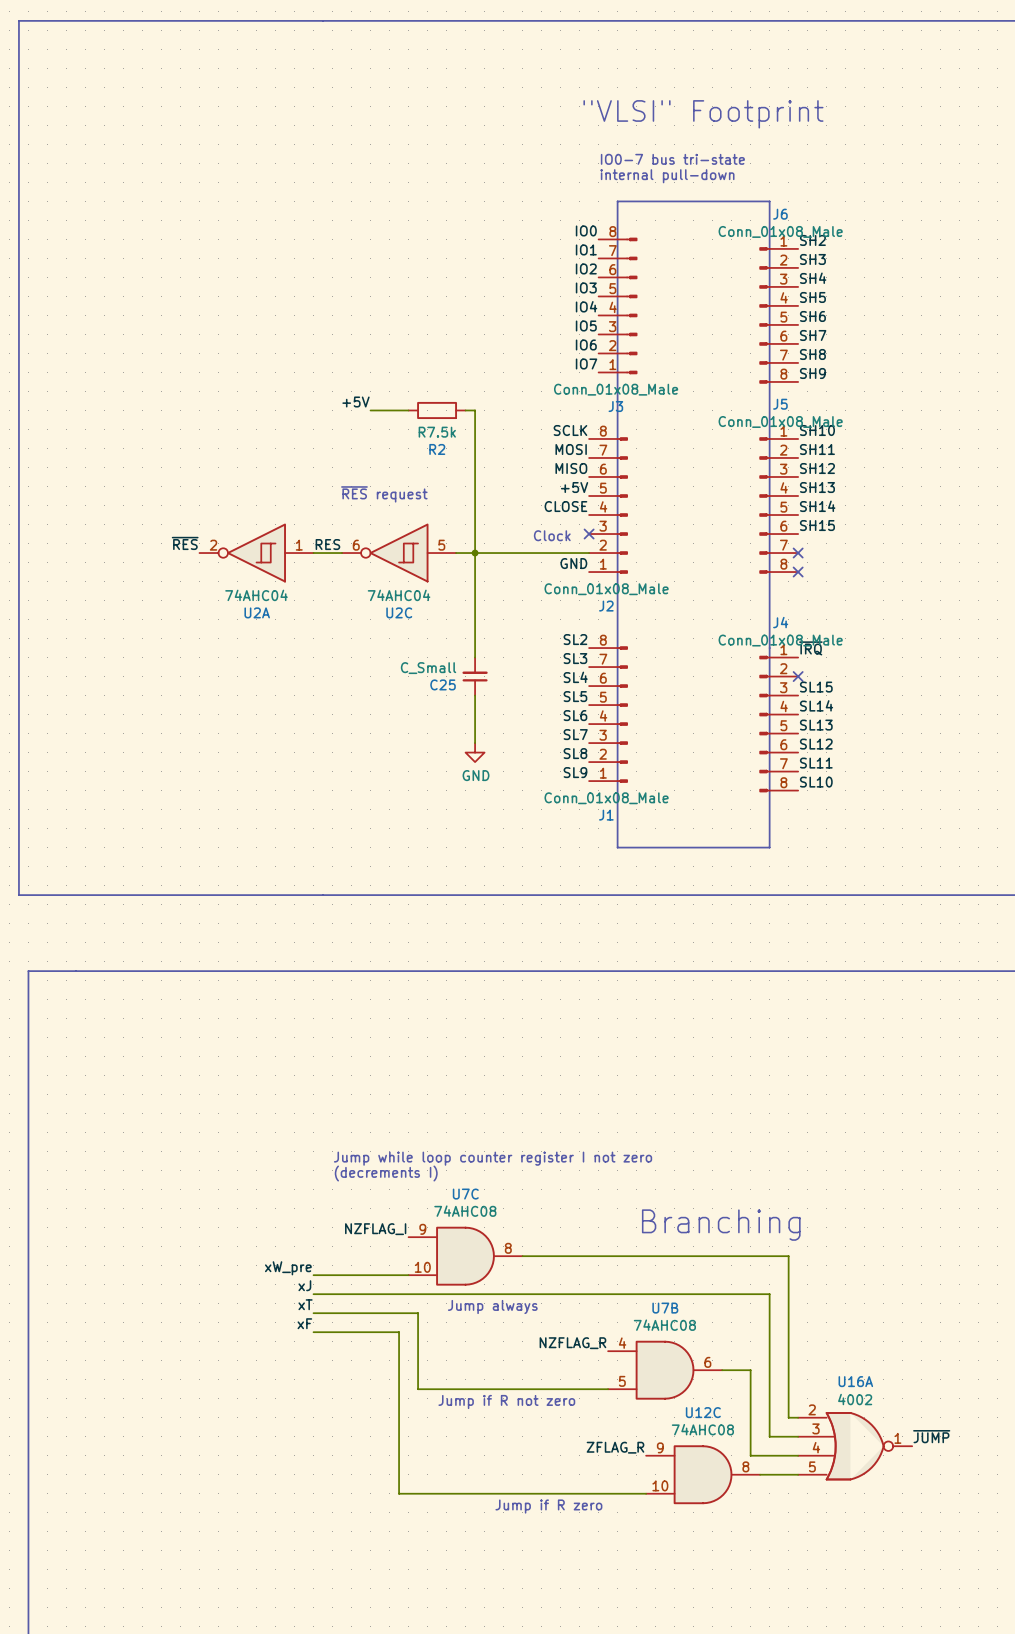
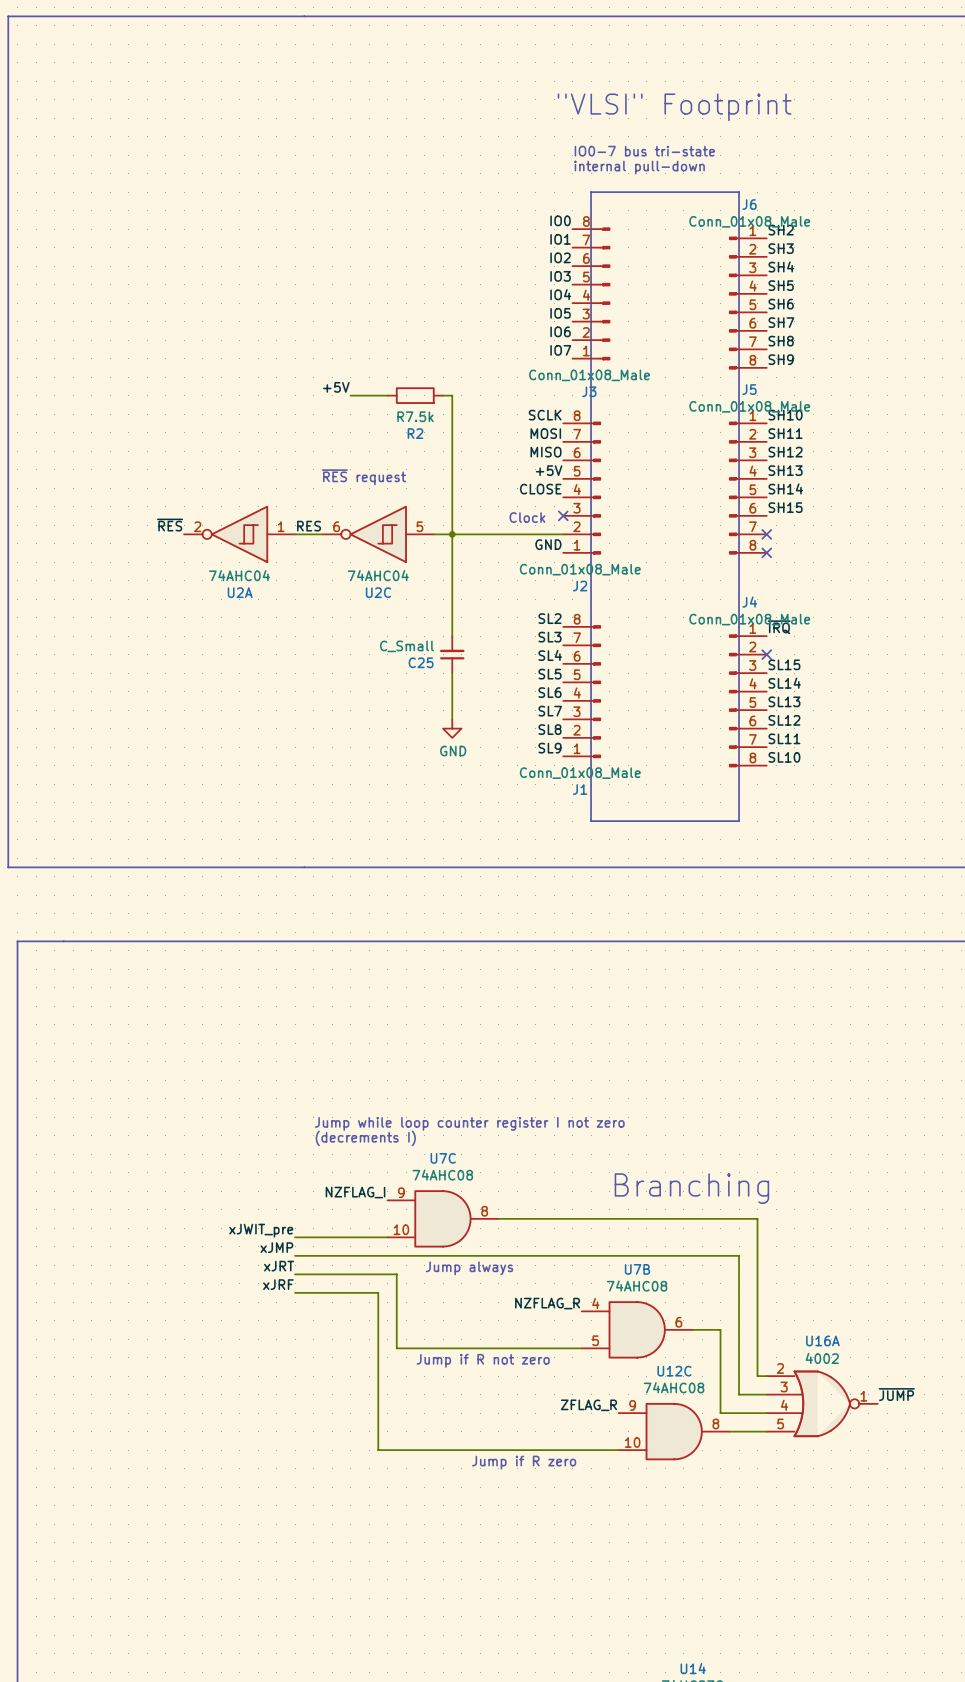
label: xW_pre (288, 1268) -> xJWIT_pre (261, 1230)
label: xJ (304, 1285) -> xJMP (276, 1247)
label: xT (305, 1304) -> xJRT (279, 1266)
label: xF (304, 1323) -> xJRF (278, 1284)

